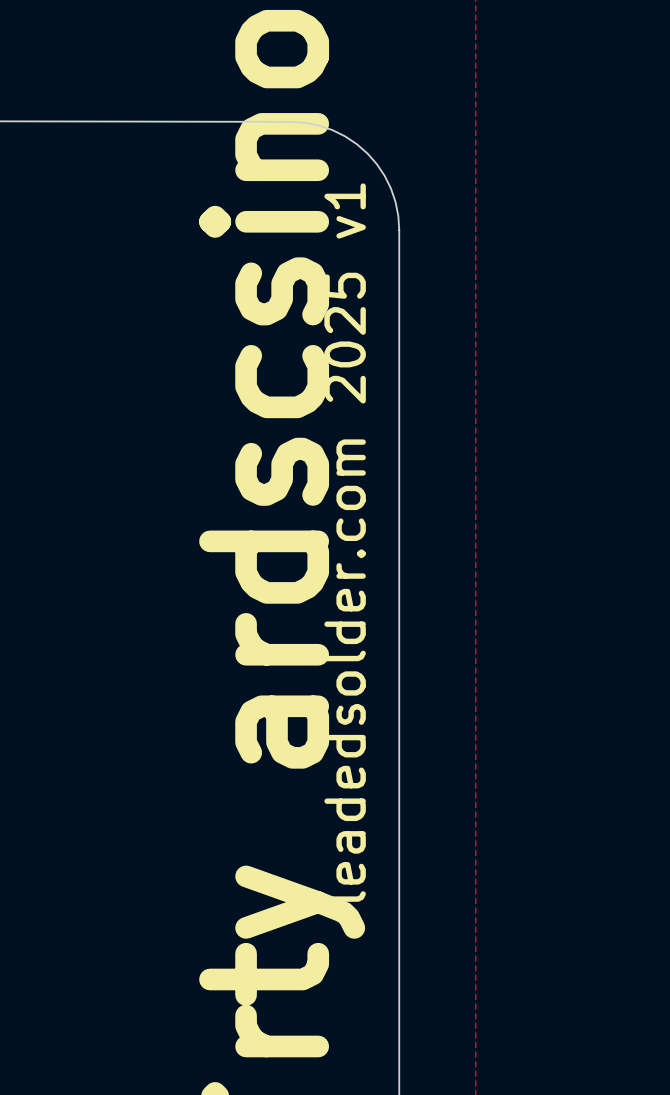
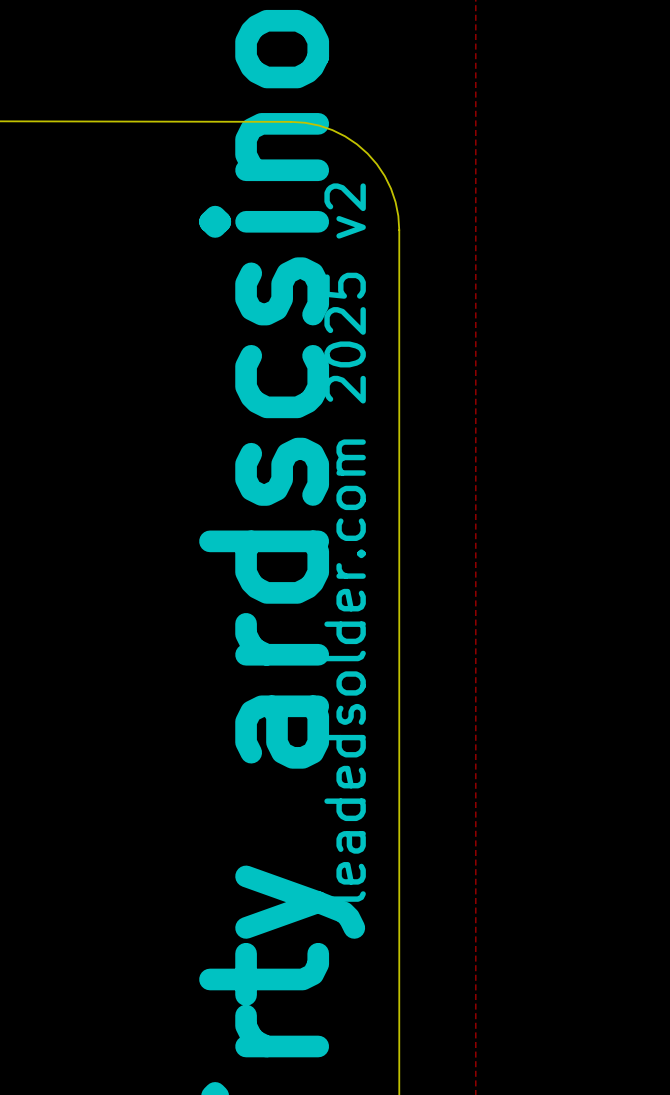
text: leadedsolder.com 2025 v1 (345, 542) -> leadedsolder.com 2025 v2 (345, 542)

